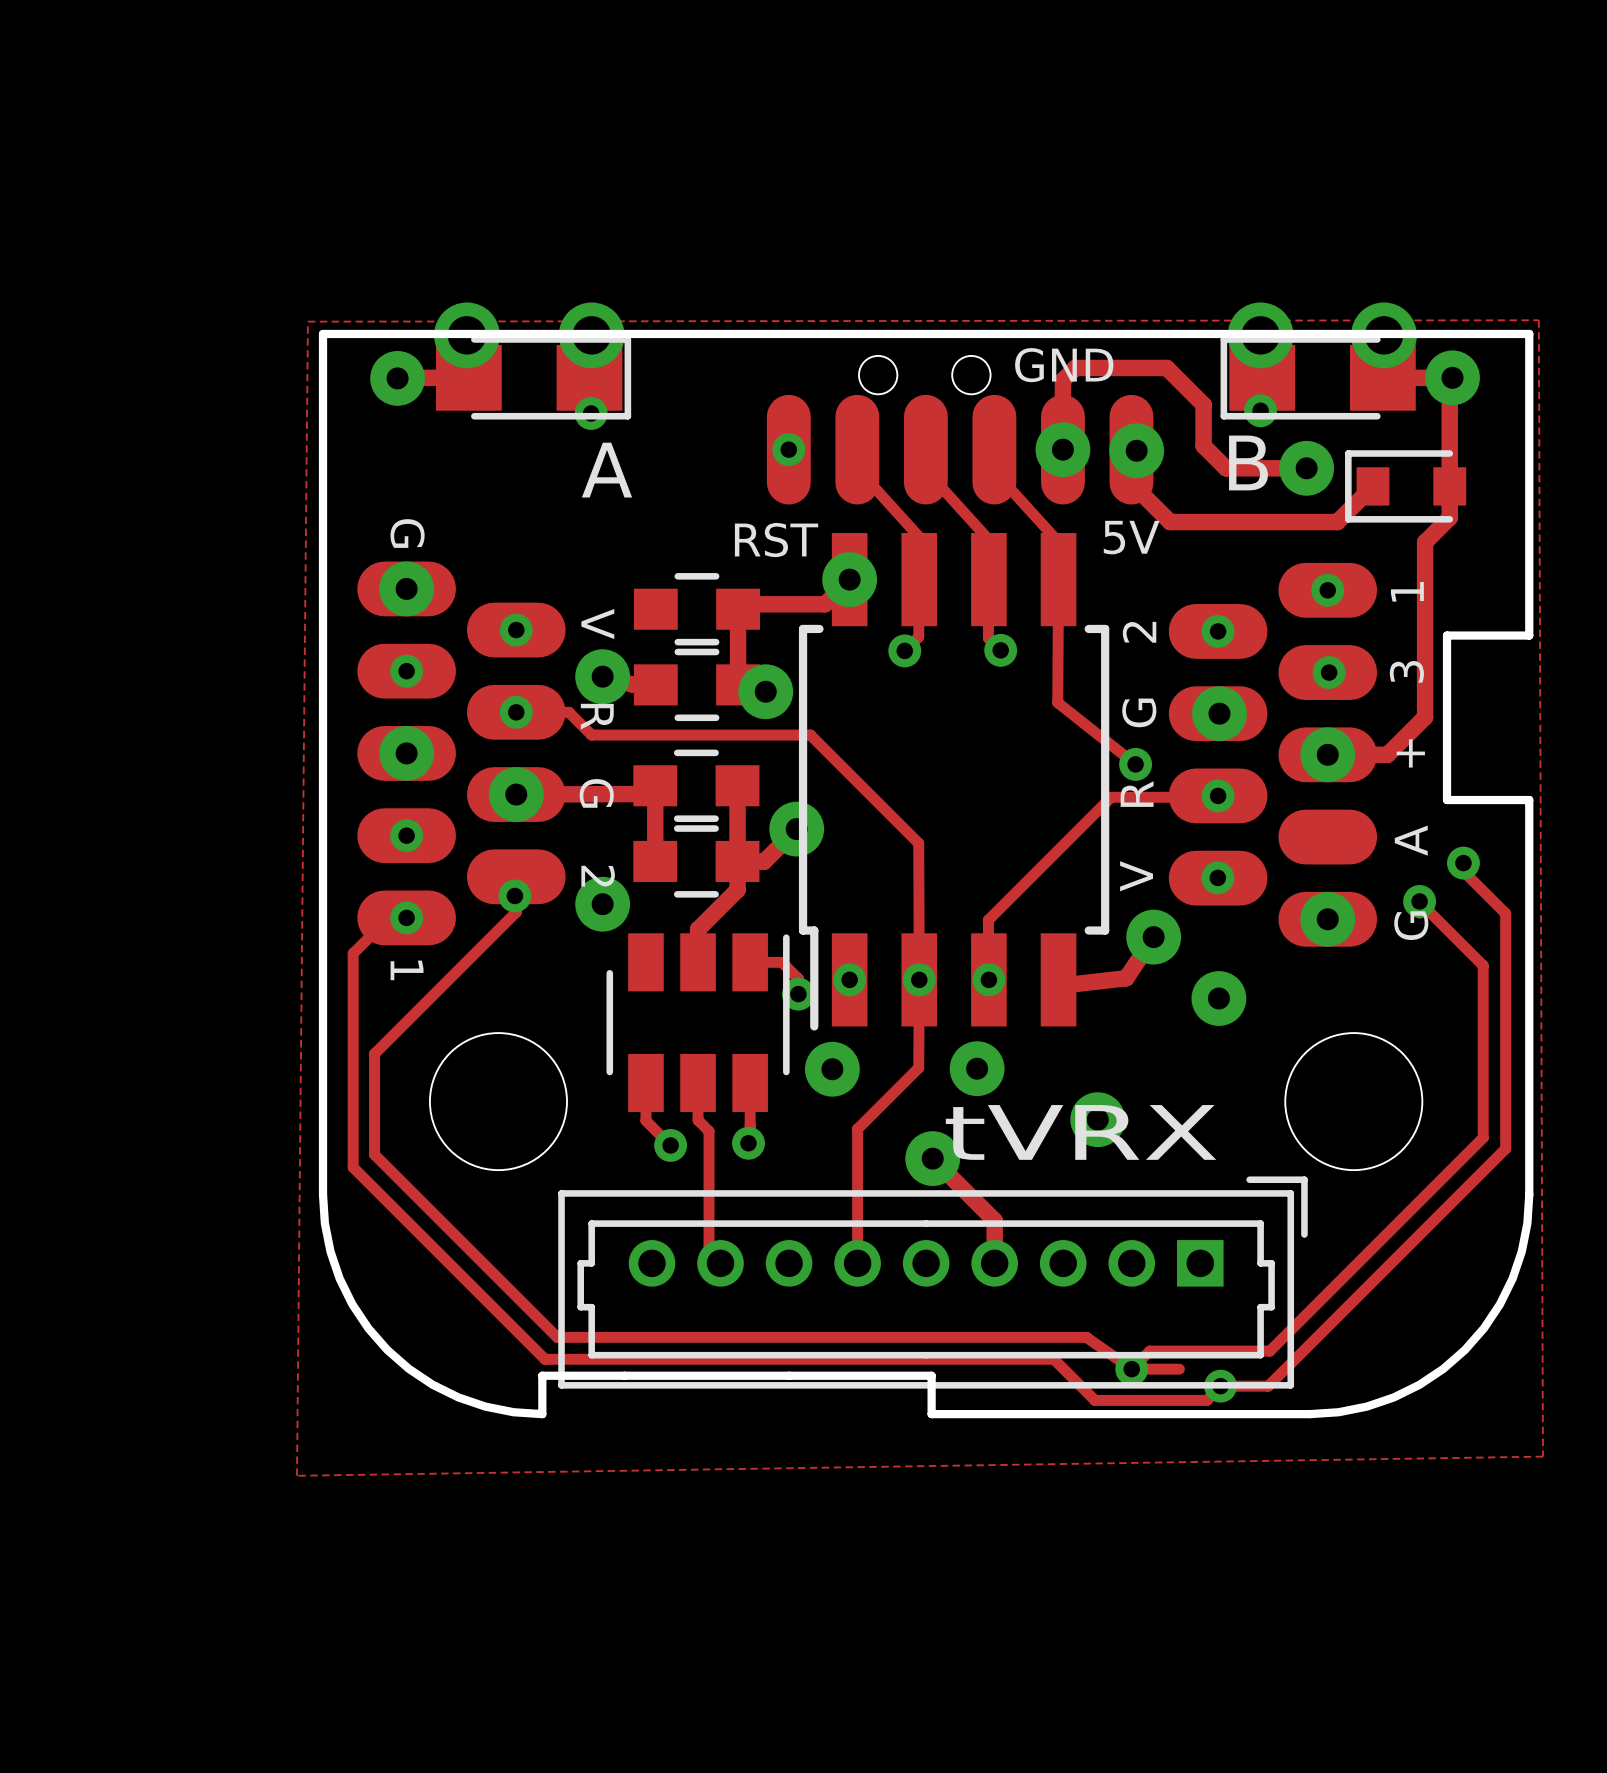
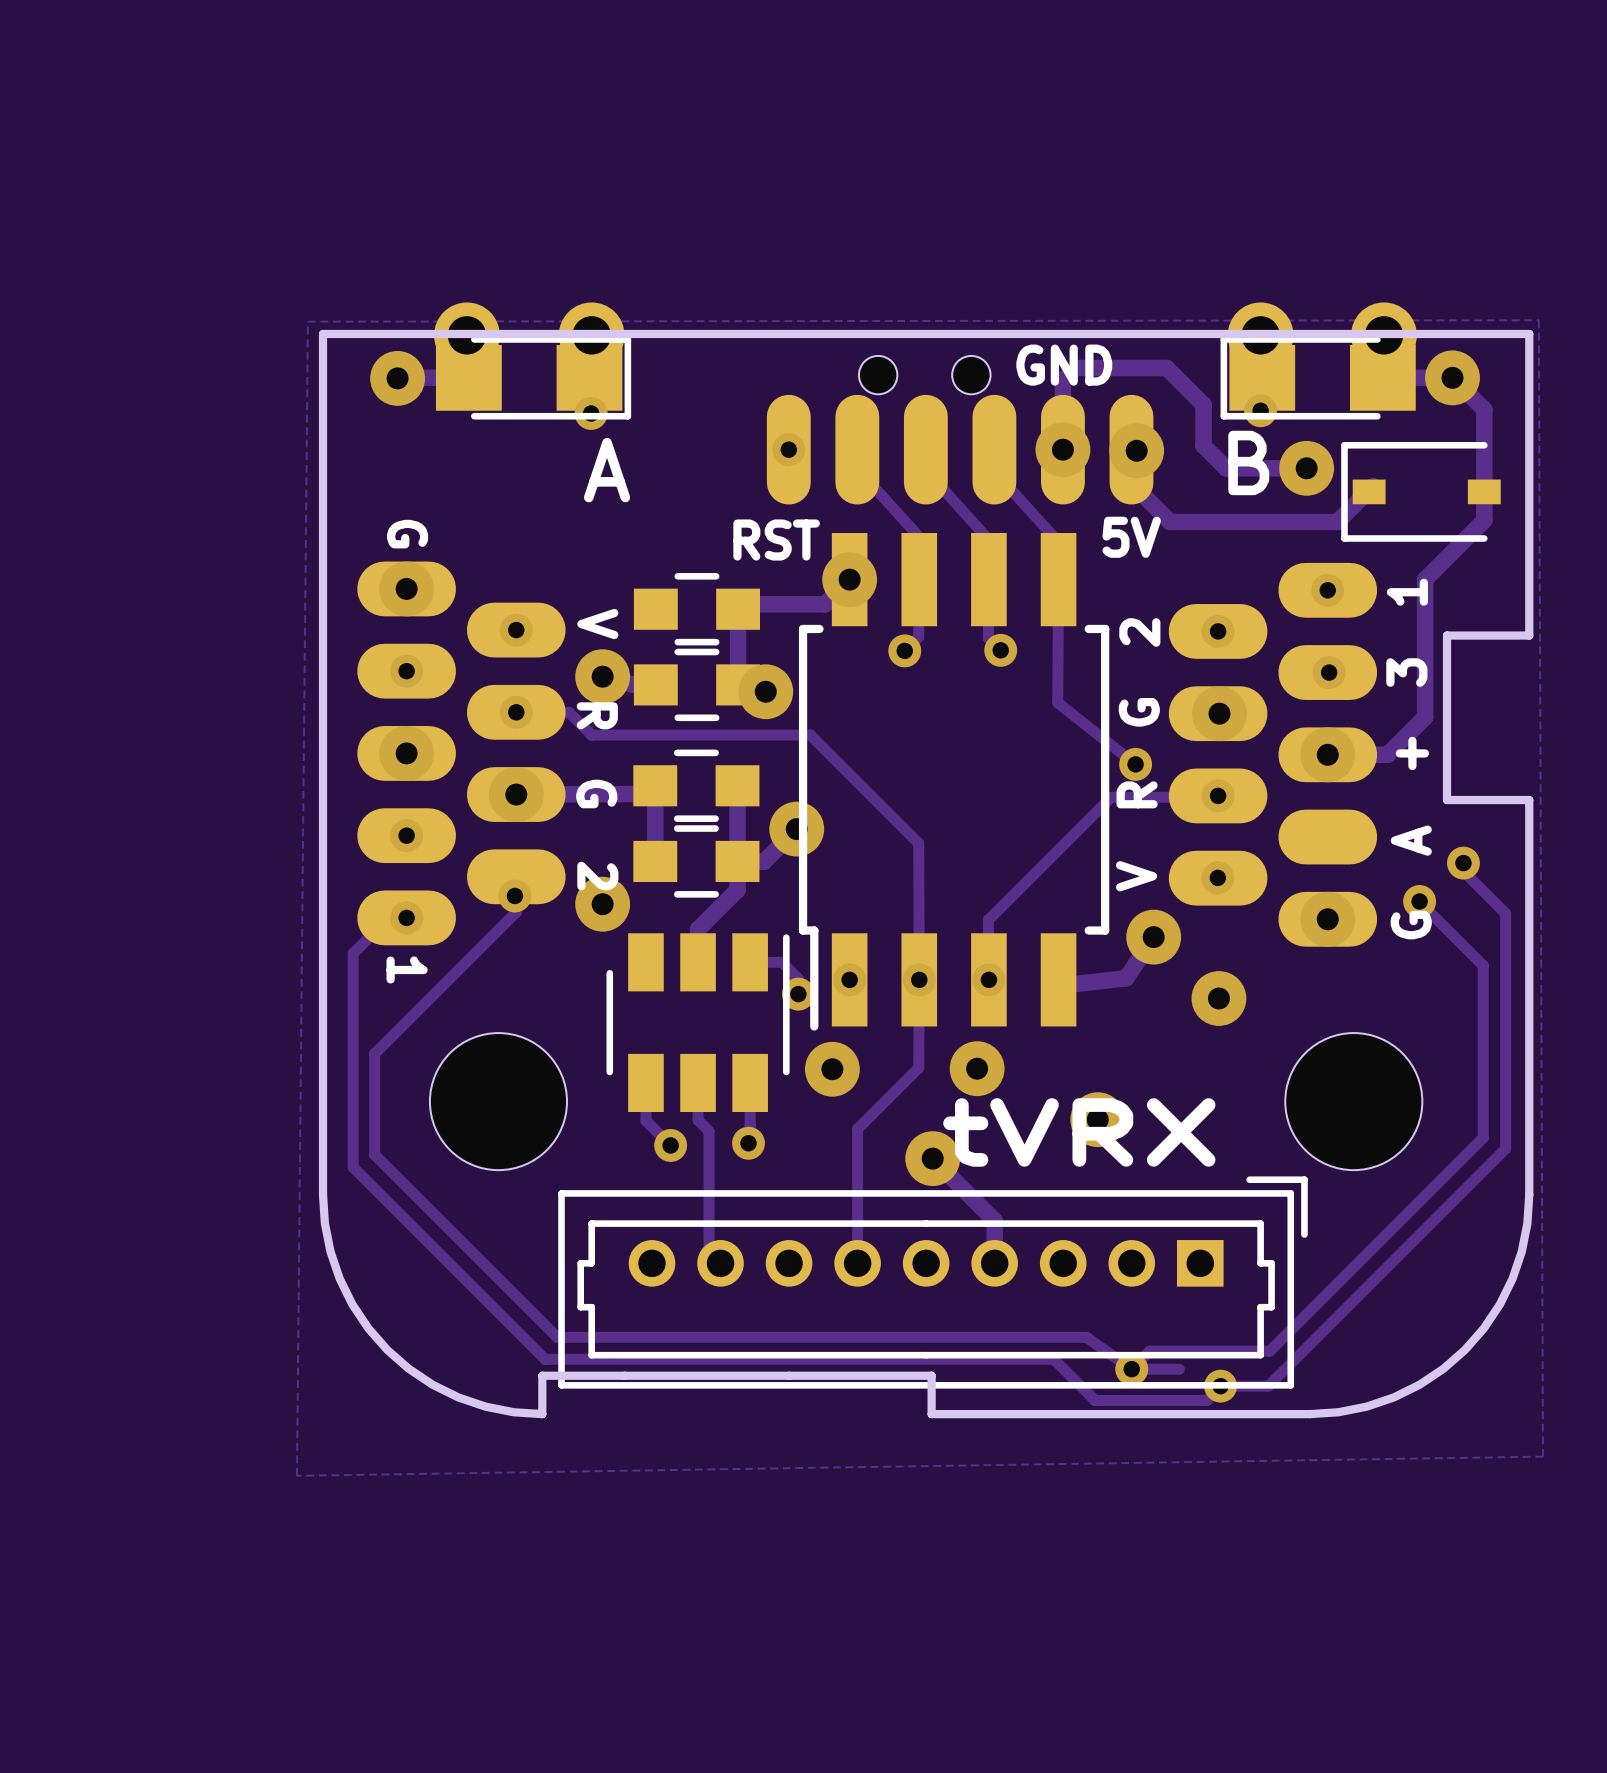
track: (1449, 380) (1449, 517) (1425, 542) (1425, 579) -> (1452, 377) (1484, 409) (1484, 520) (1425, 579)
part footprint: [1345, 450, 1467, 523] -> [1341, 442, 1501, 542]

